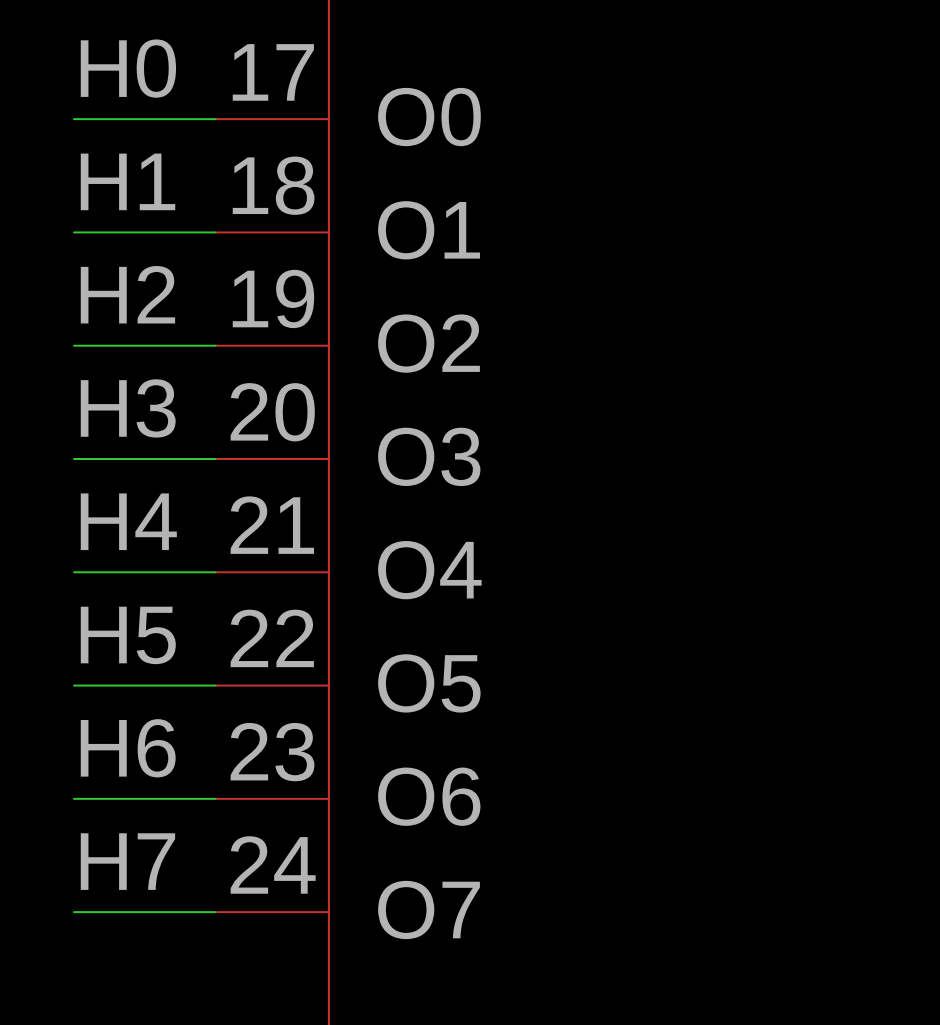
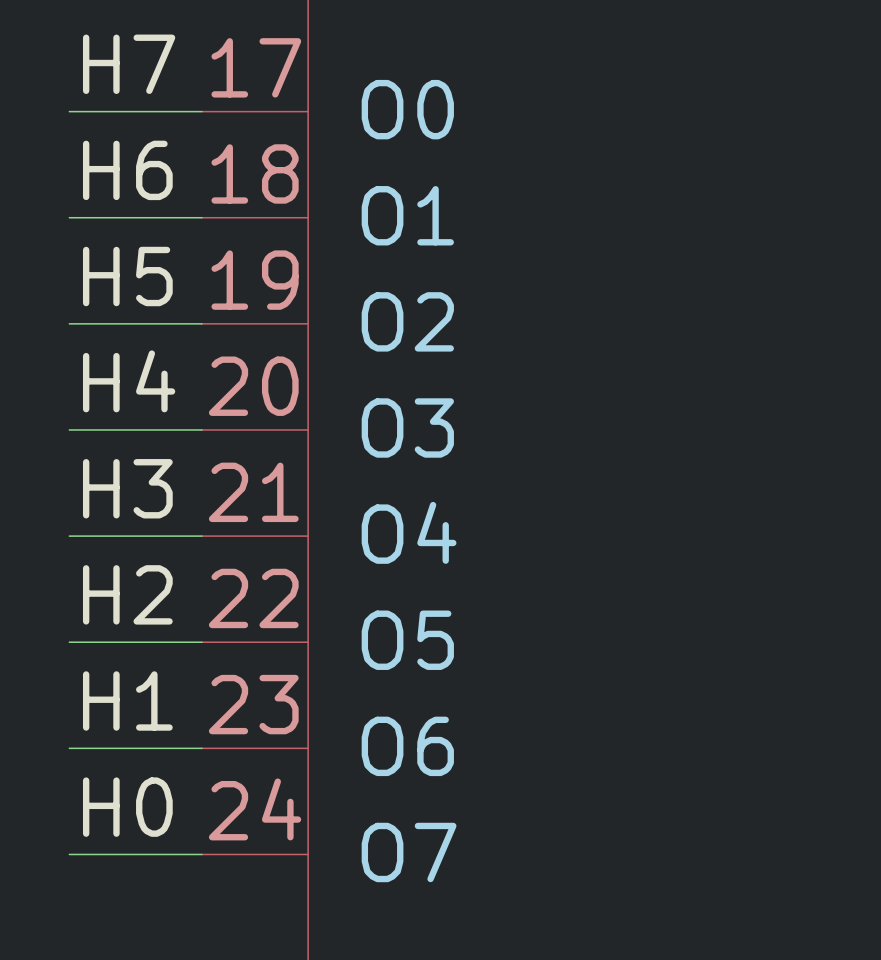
label: H0 (128, 68) -> H7 (129, 64)
label: H1 (128, 181) -> H6 (127, 170)
label: H2 (127, 294) -> H5 (127, 276)
label: H3 (128, 408) -> H4 (129, 381)
label: H4 (128, 521) -> H3 (127, 488)
label: H5 (128, 635) -> H2 (127, 594)
label: H6 (128, 748) -> H1 (127, 701)
label: H7 (127, 861) -> H0 (127, 807)

